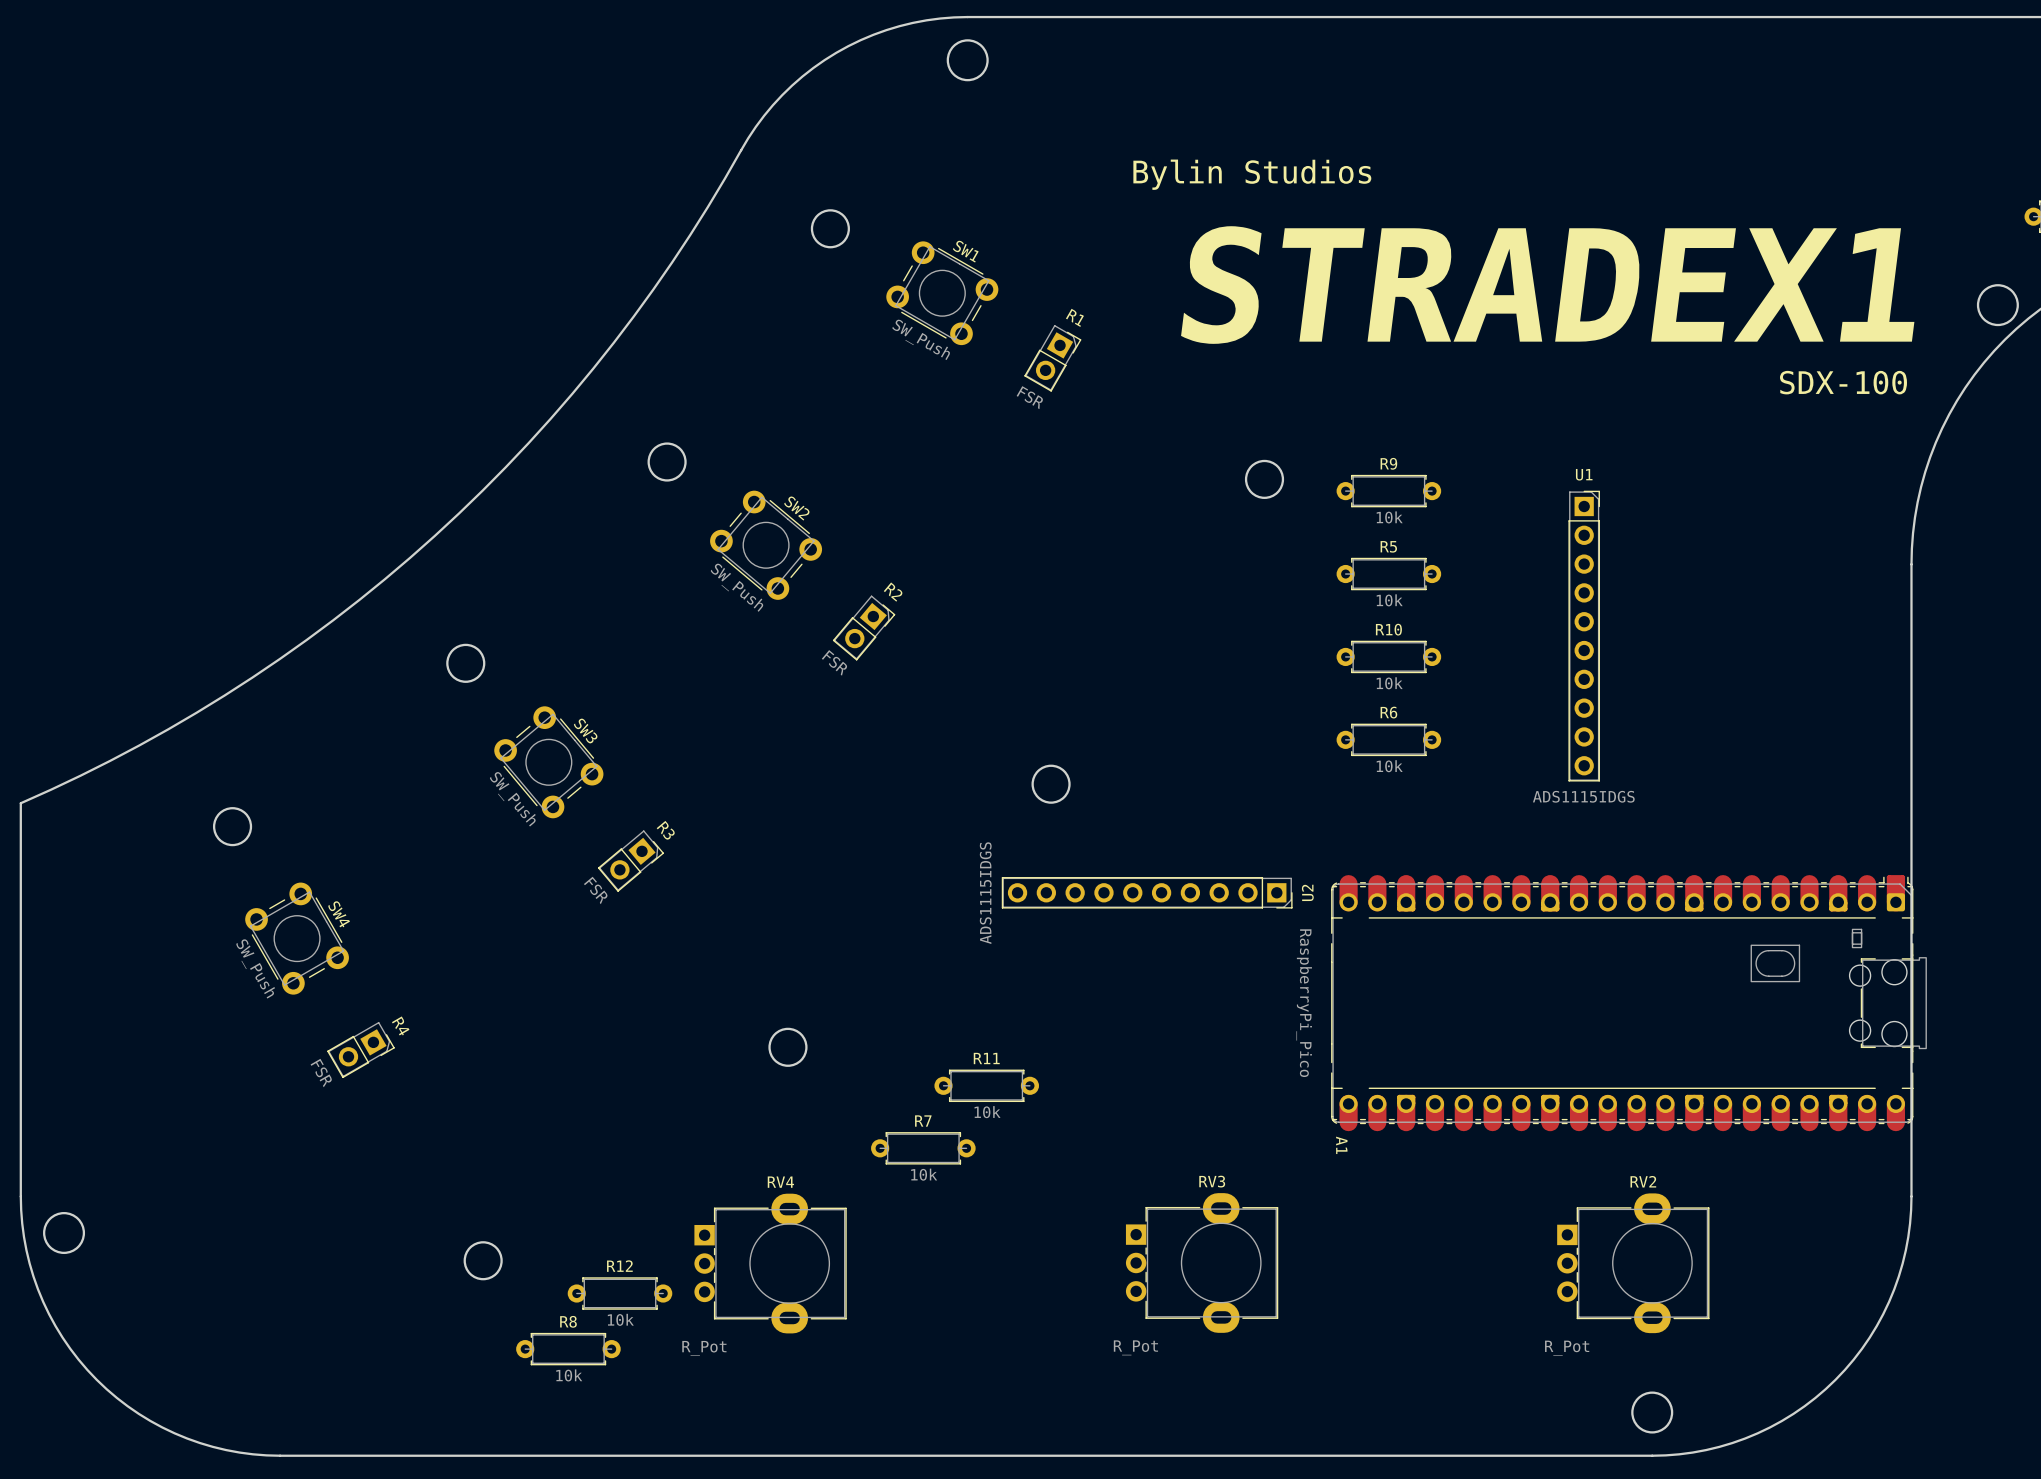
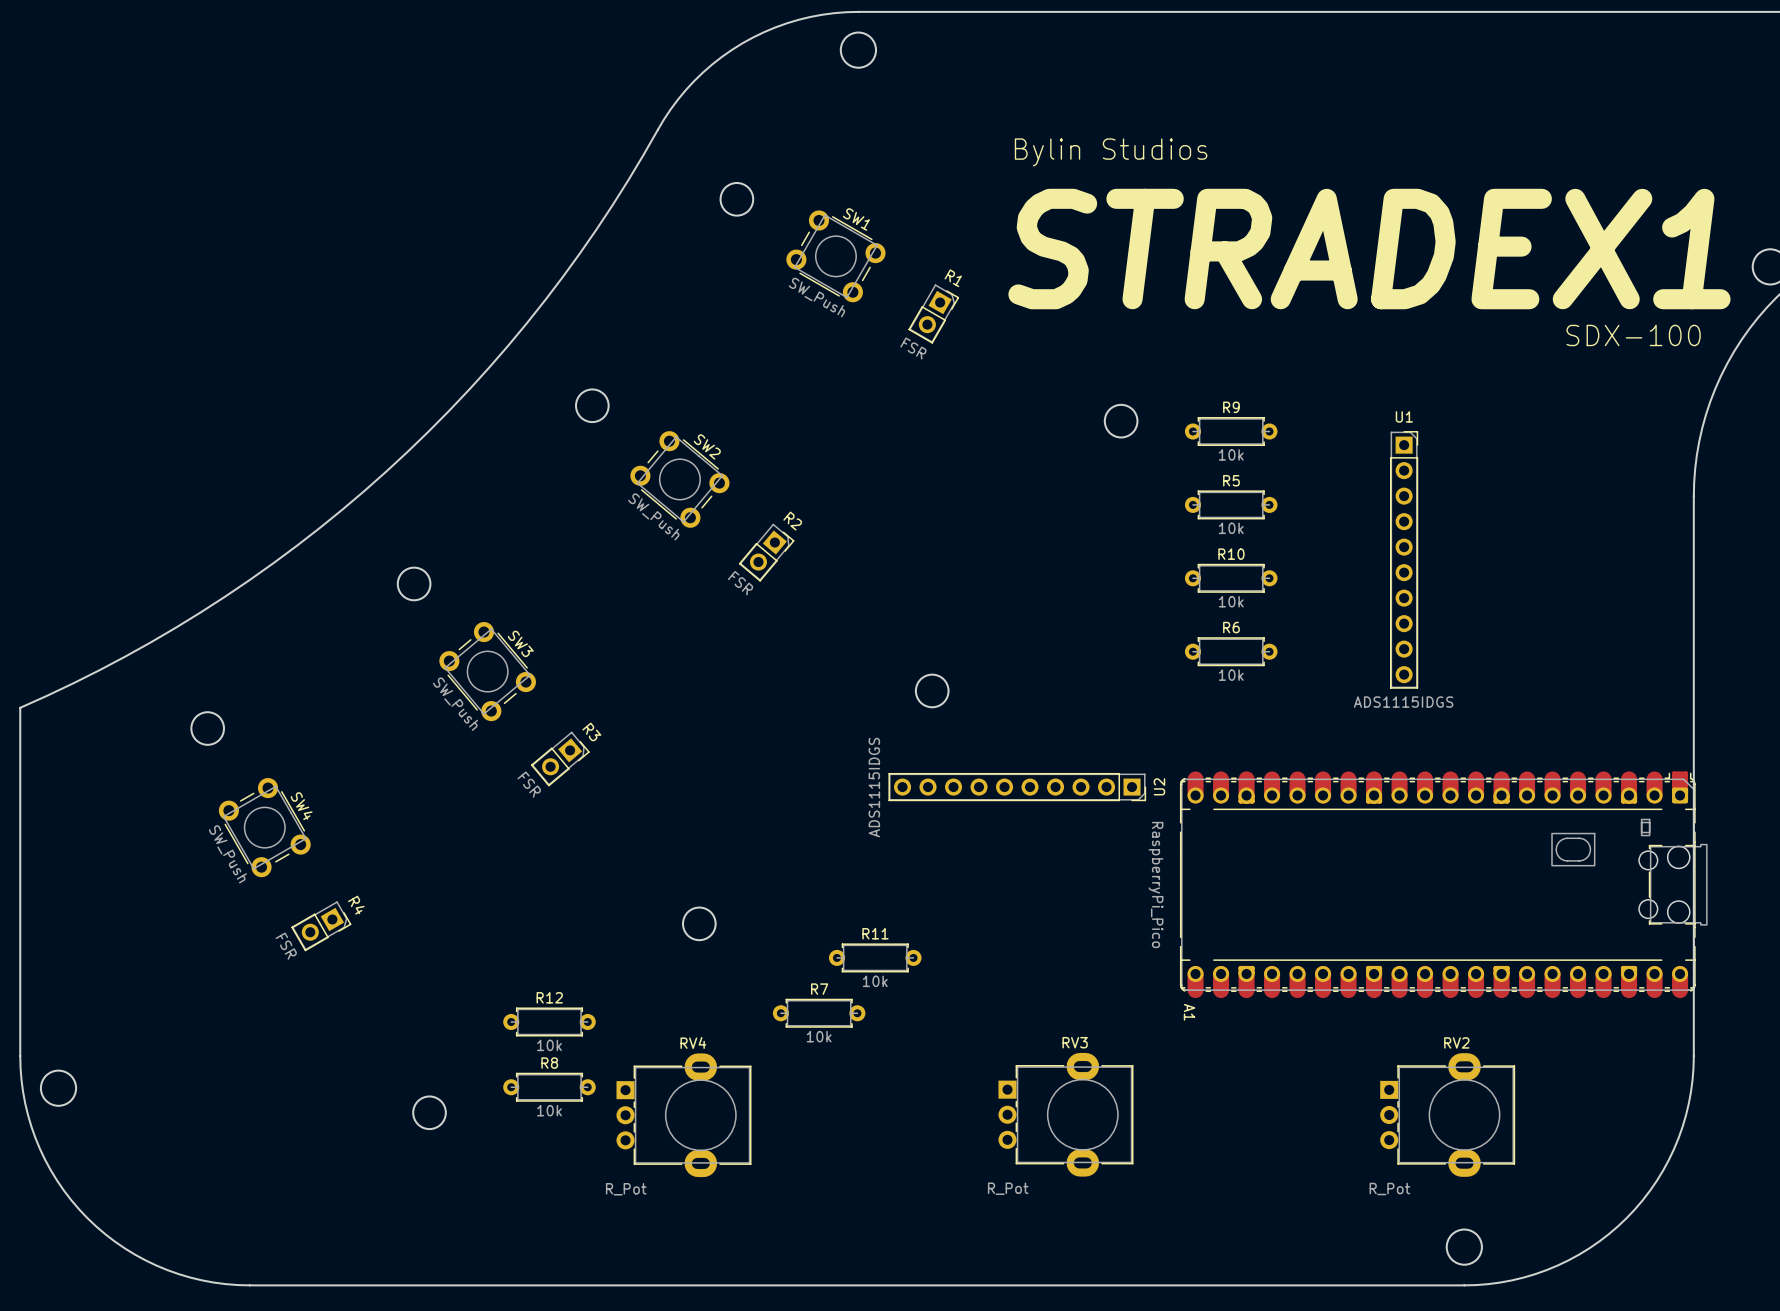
R12 position: (620, 1293) -> (549, 1021)
R8 position: (568, 1349) -> (549, 1087)

